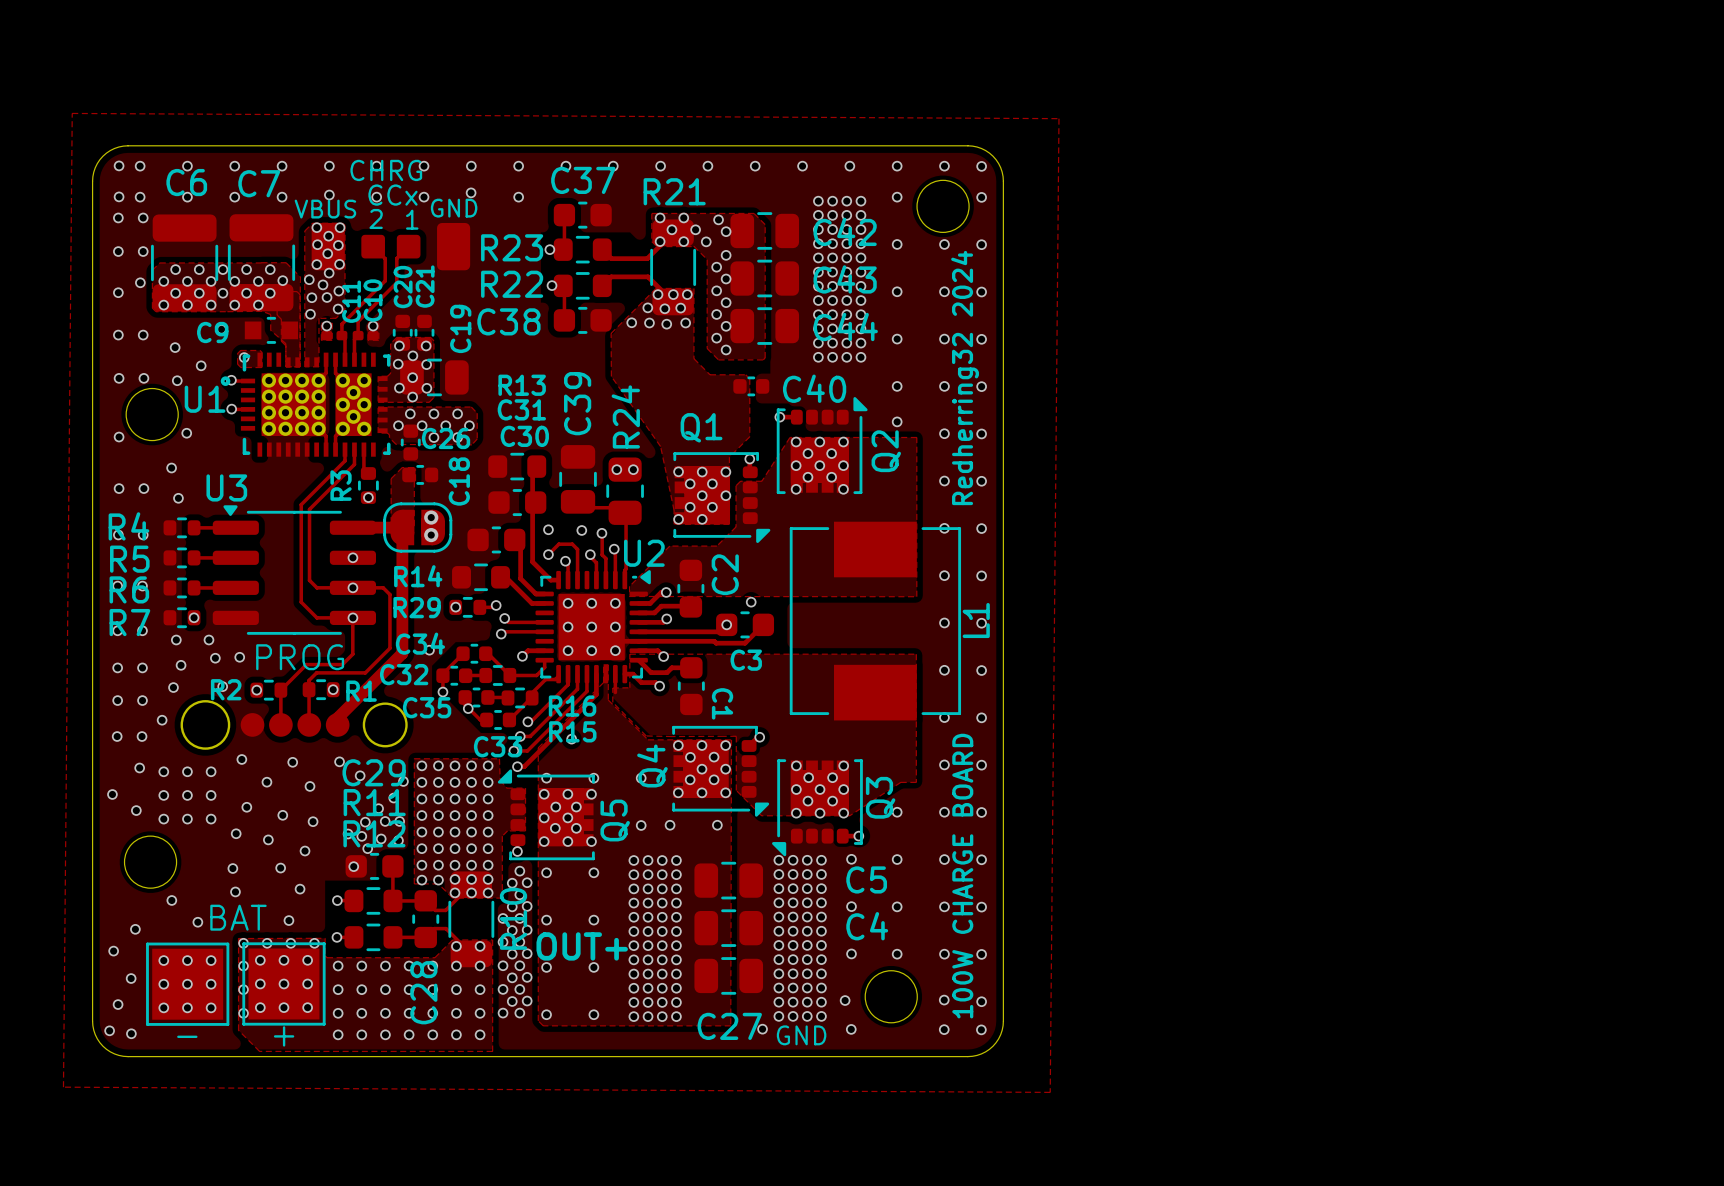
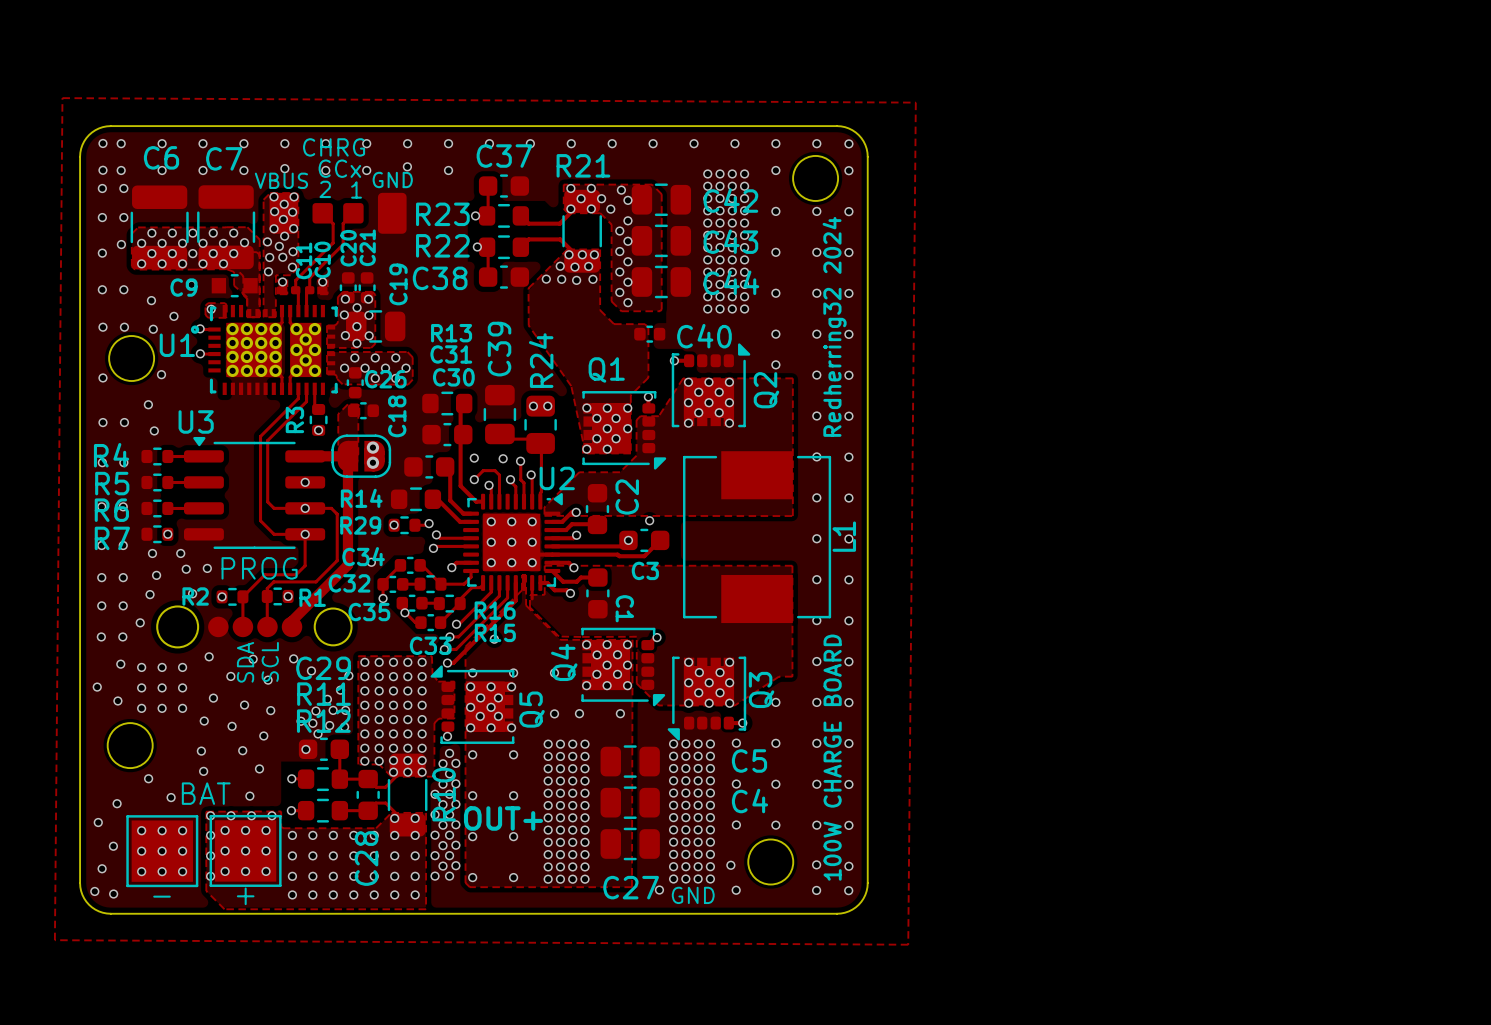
text: none -> SDA (245, 662)
text: none -> SCL (270, 661)

